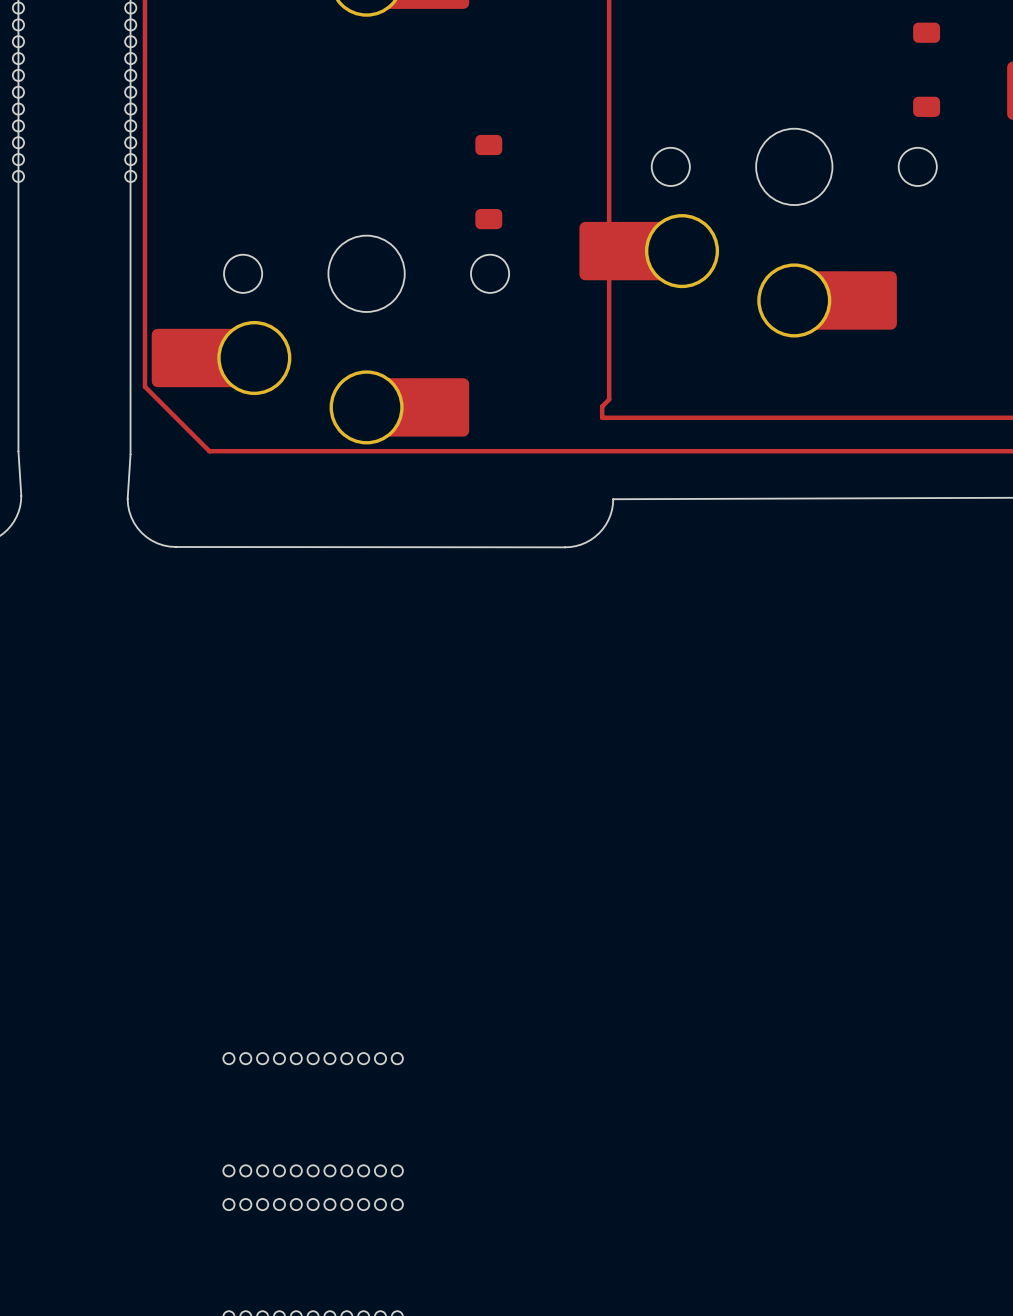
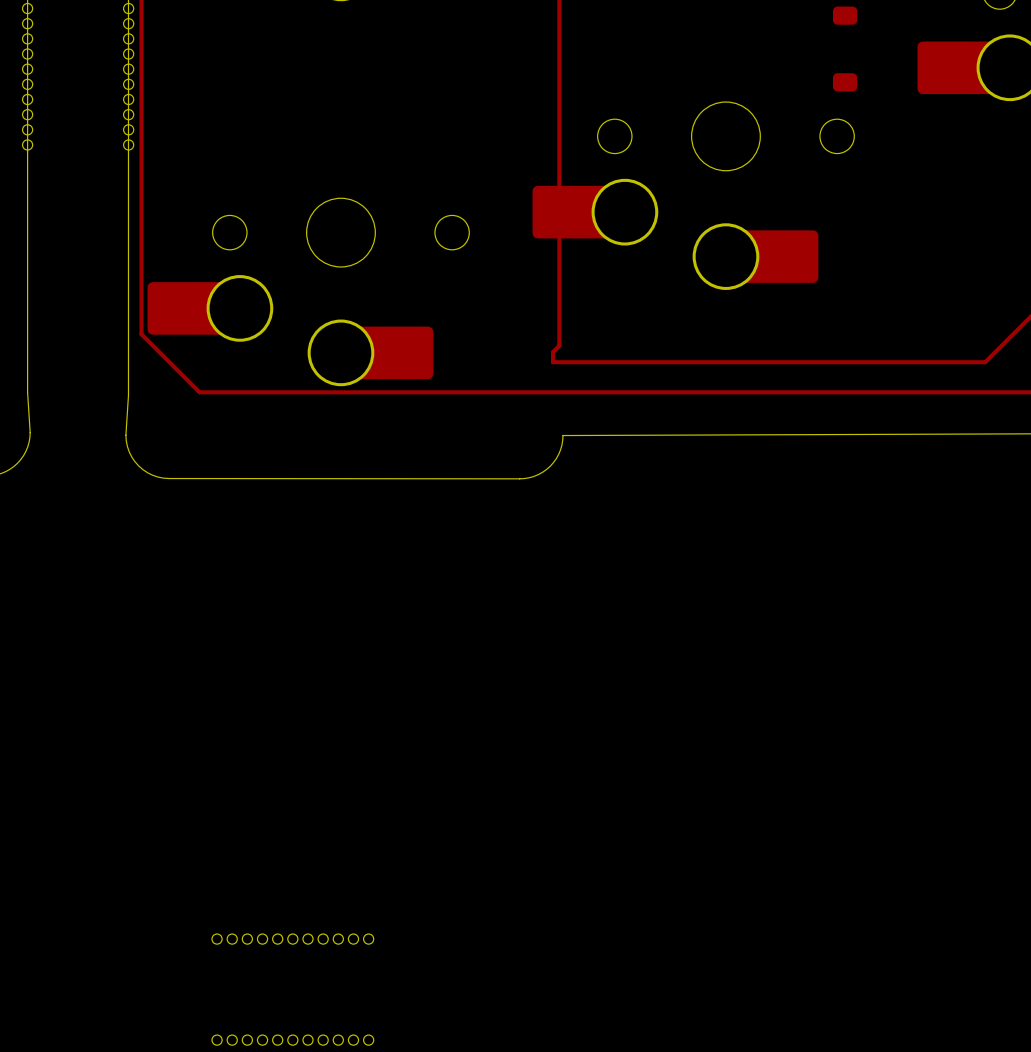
part: (488, 182) -> none

